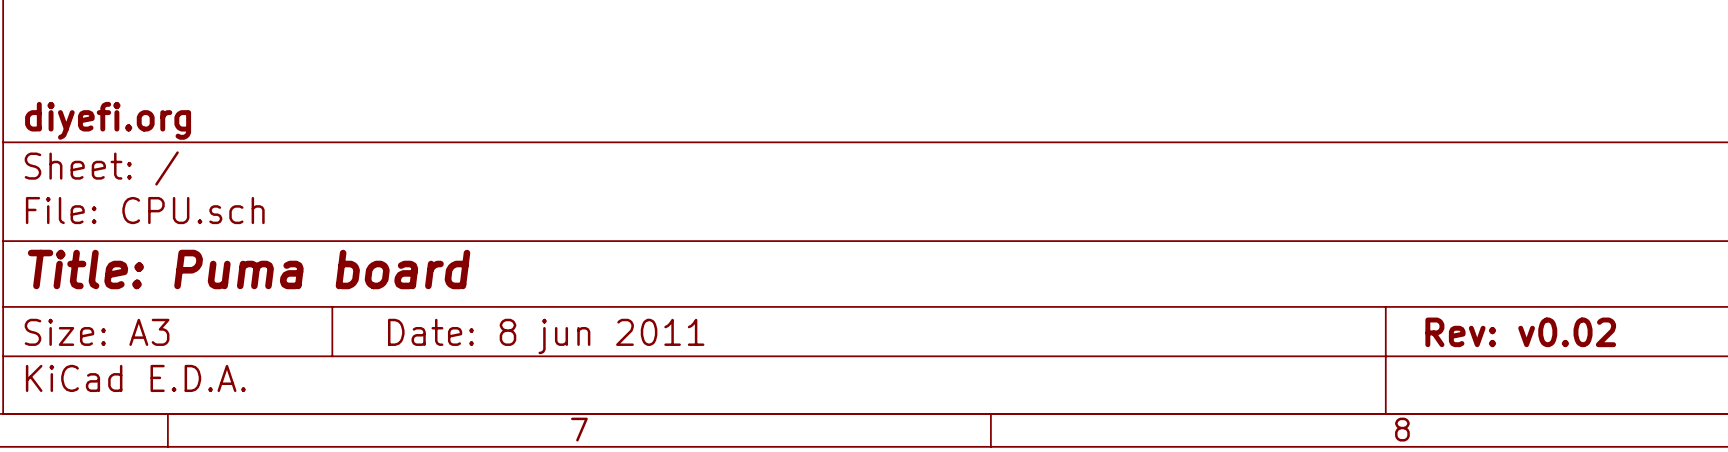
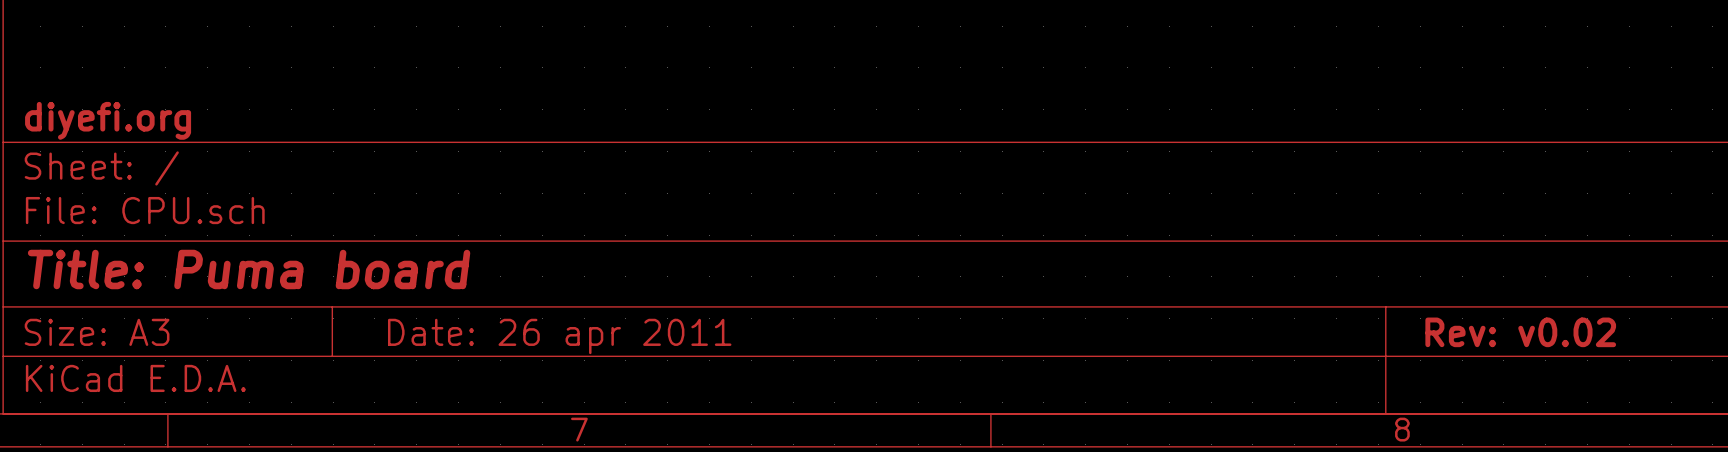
title block: Date: 8 jun 2011 (546, 336) -> Date: 26 apr 2011 (559, 336)

